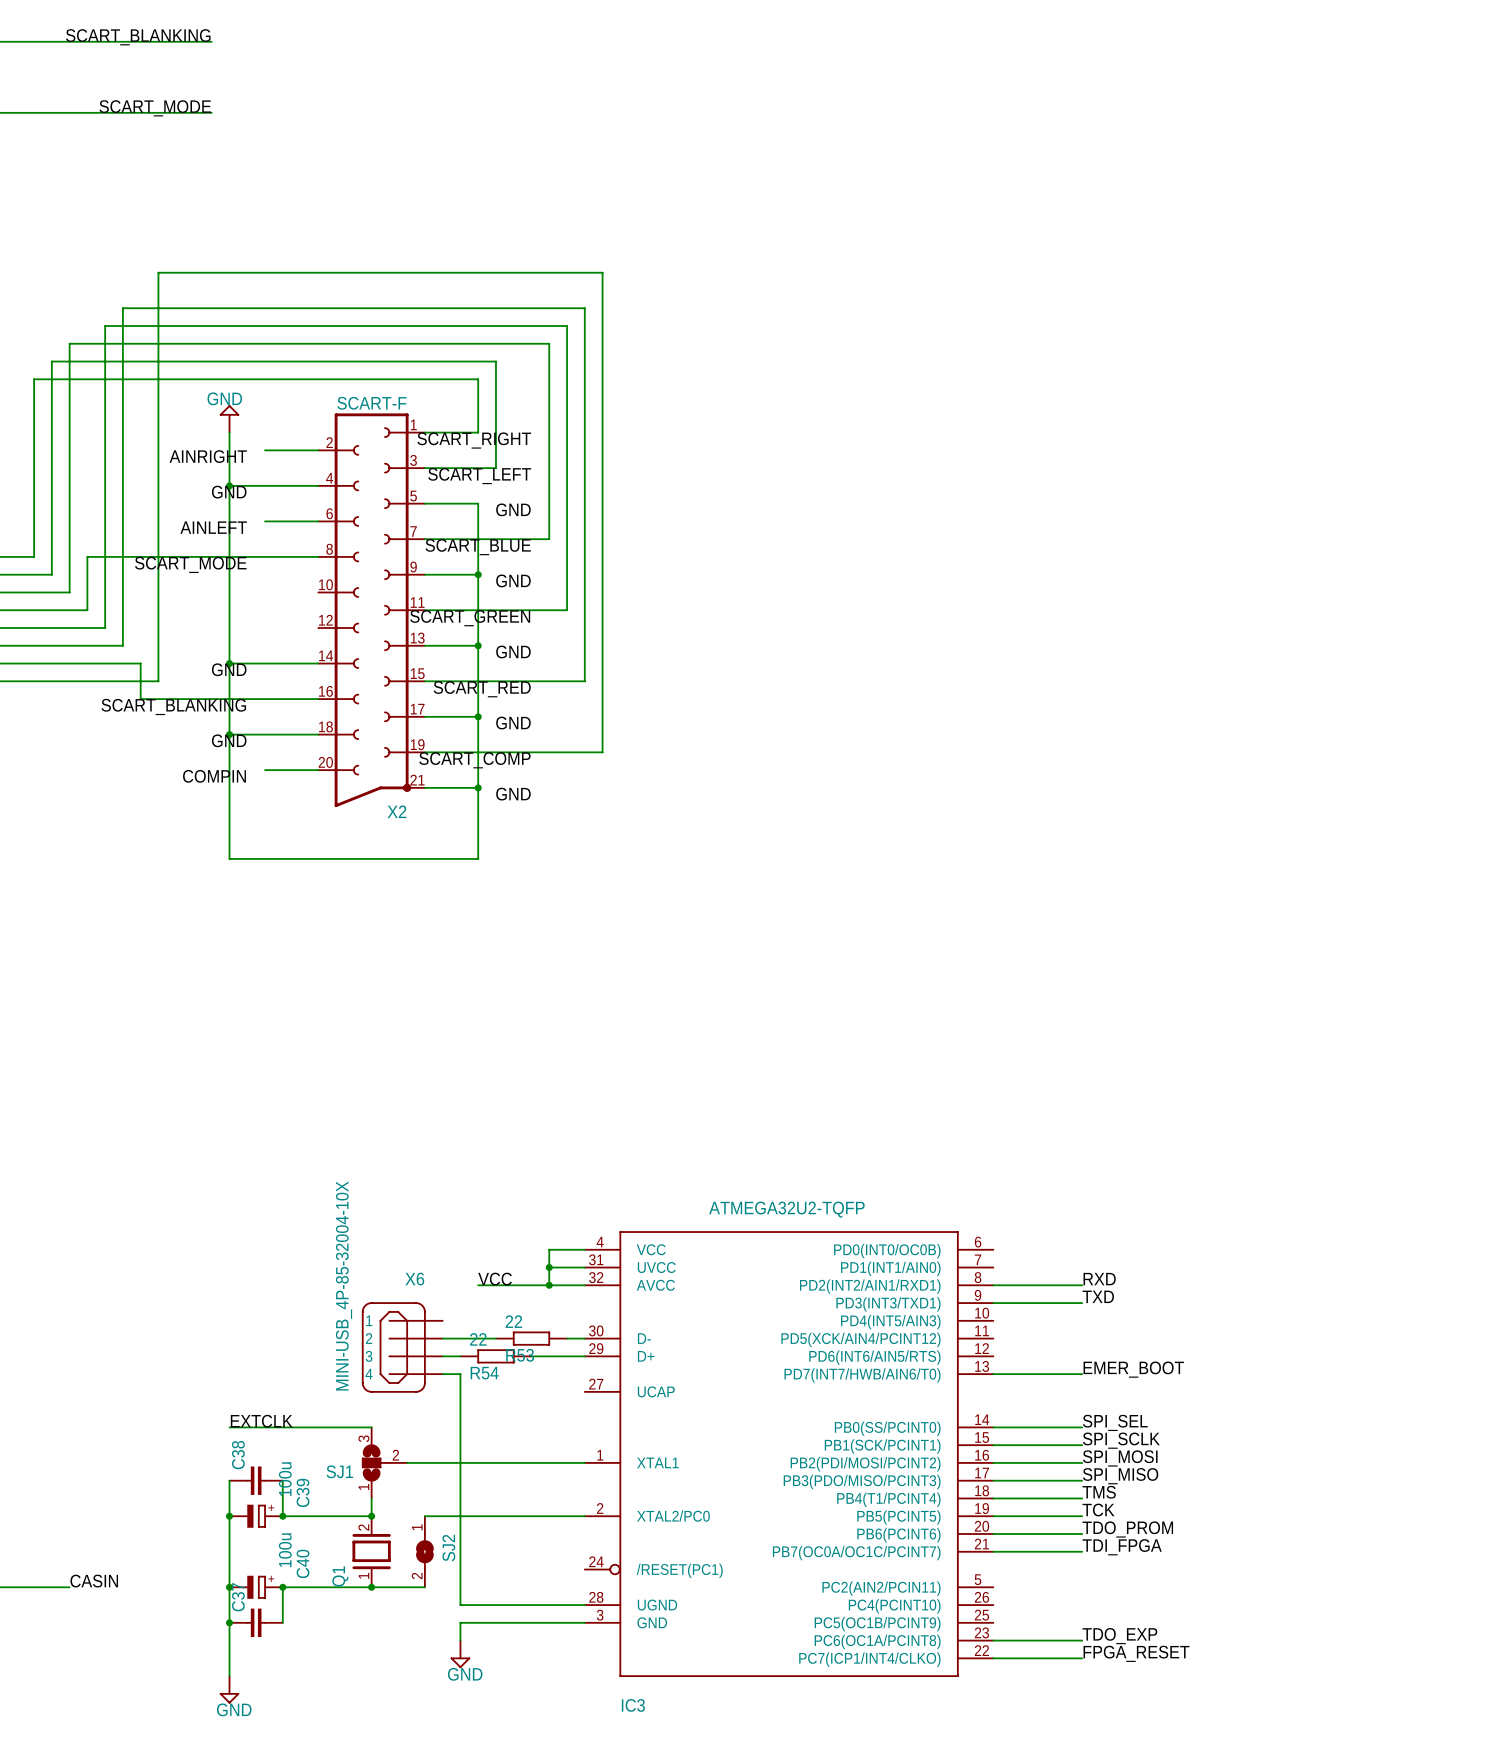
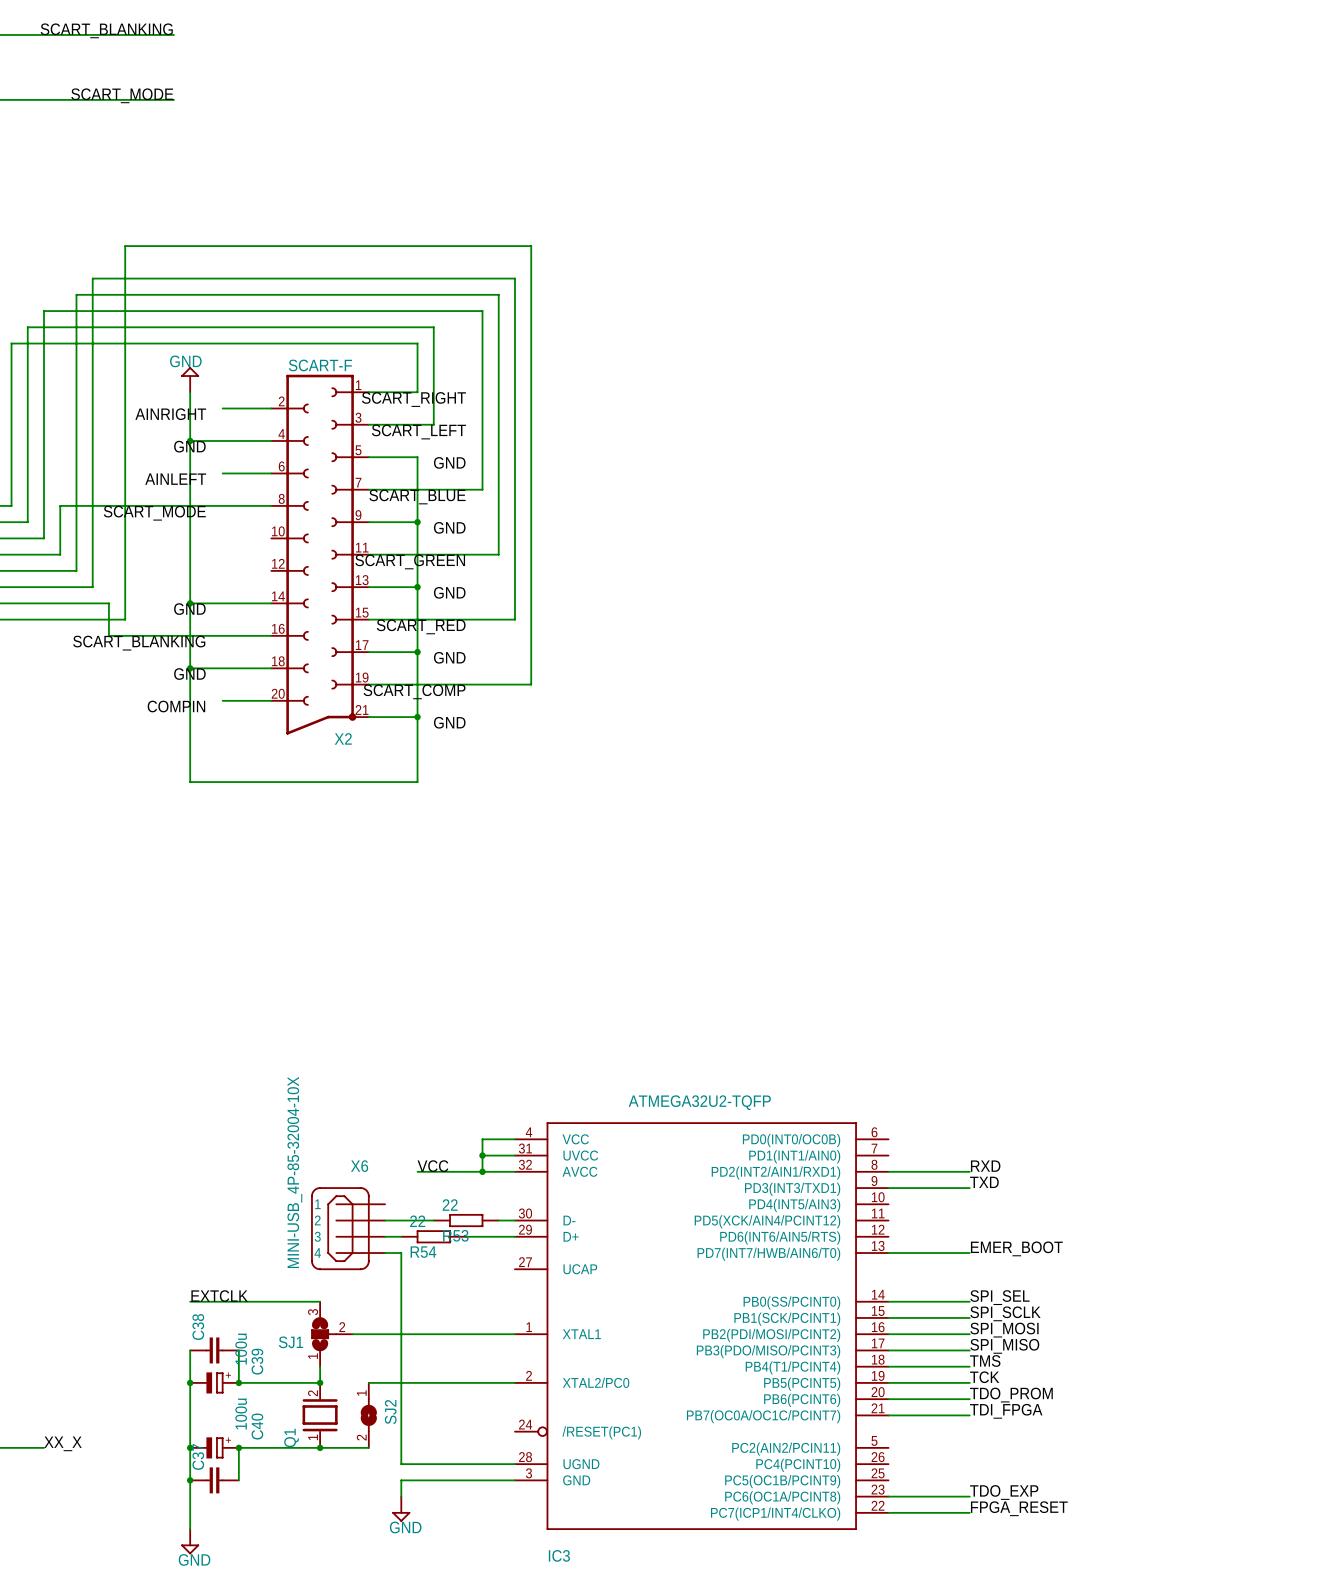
label: CASIN (94, 1581) -> XX_X (63, 1443)

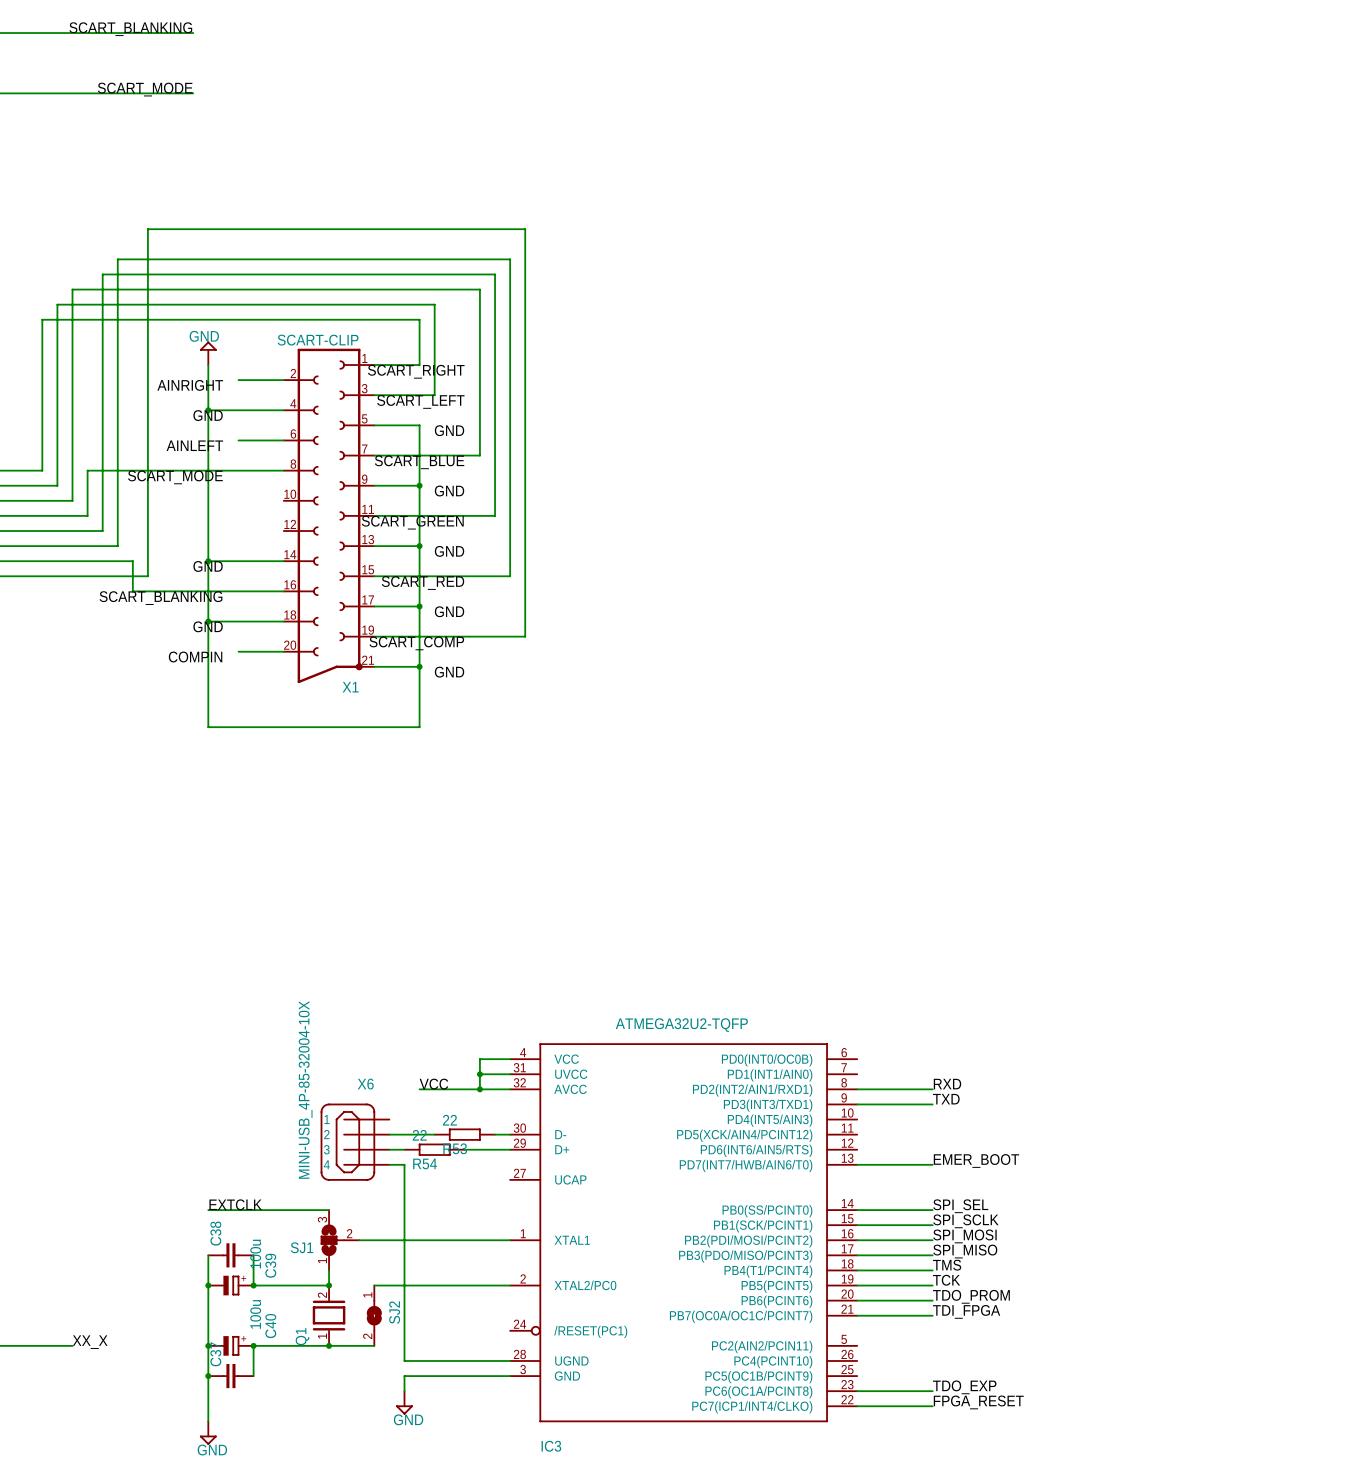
X2 value: SCART-F (320, 365) -> SCART-CLIP (318, 340)
X2 name: X2 (343, 738) -> X1 (350, 687)

